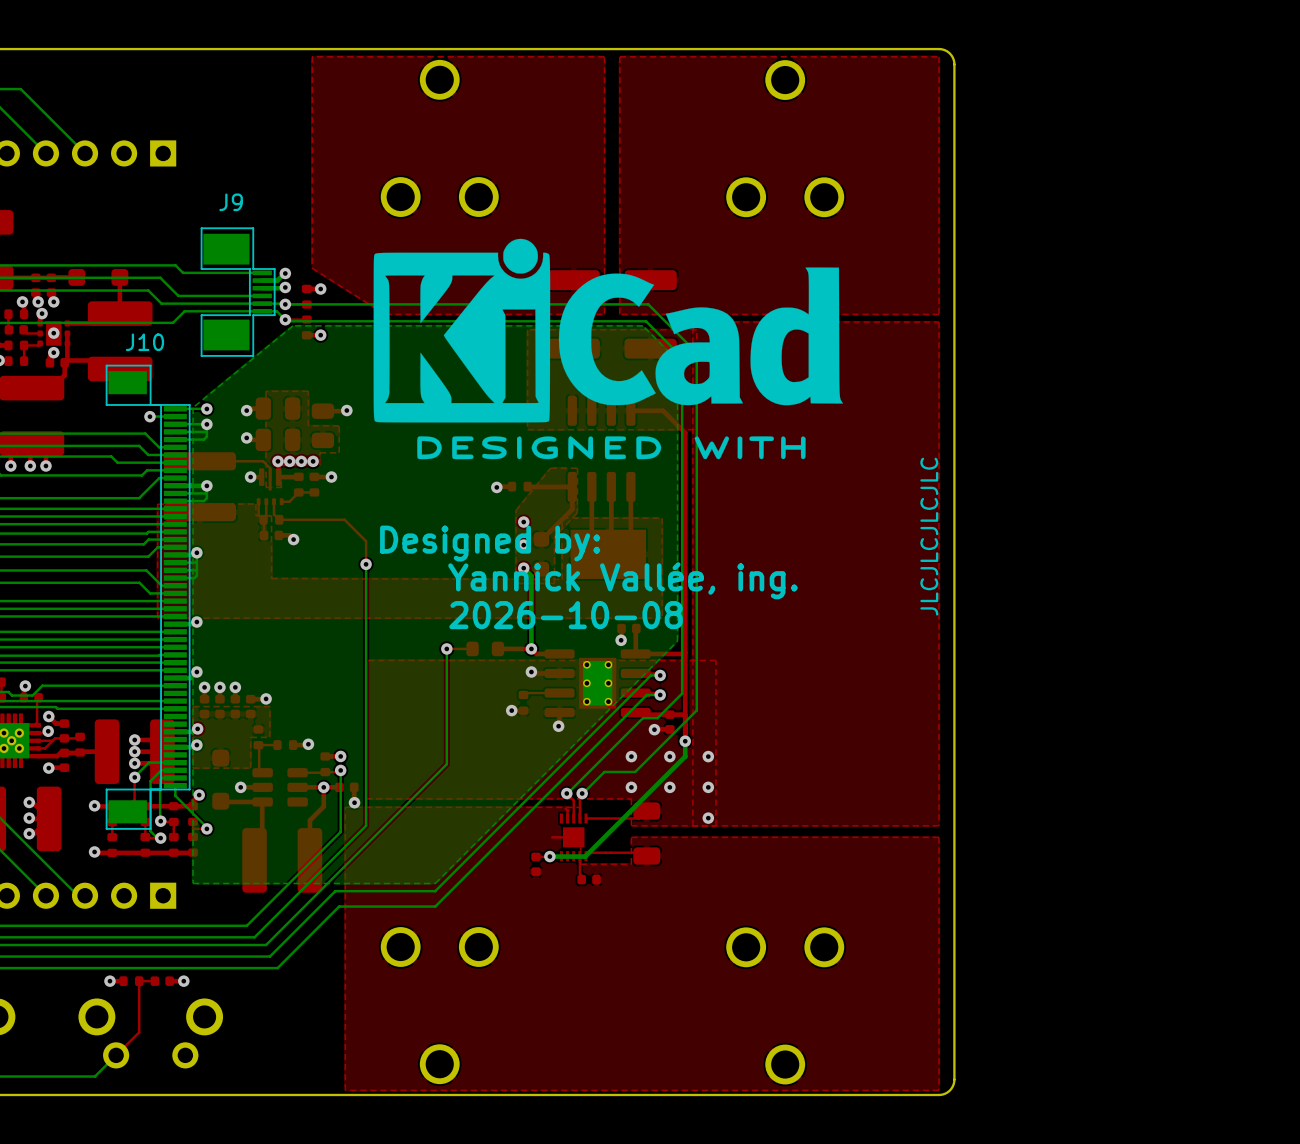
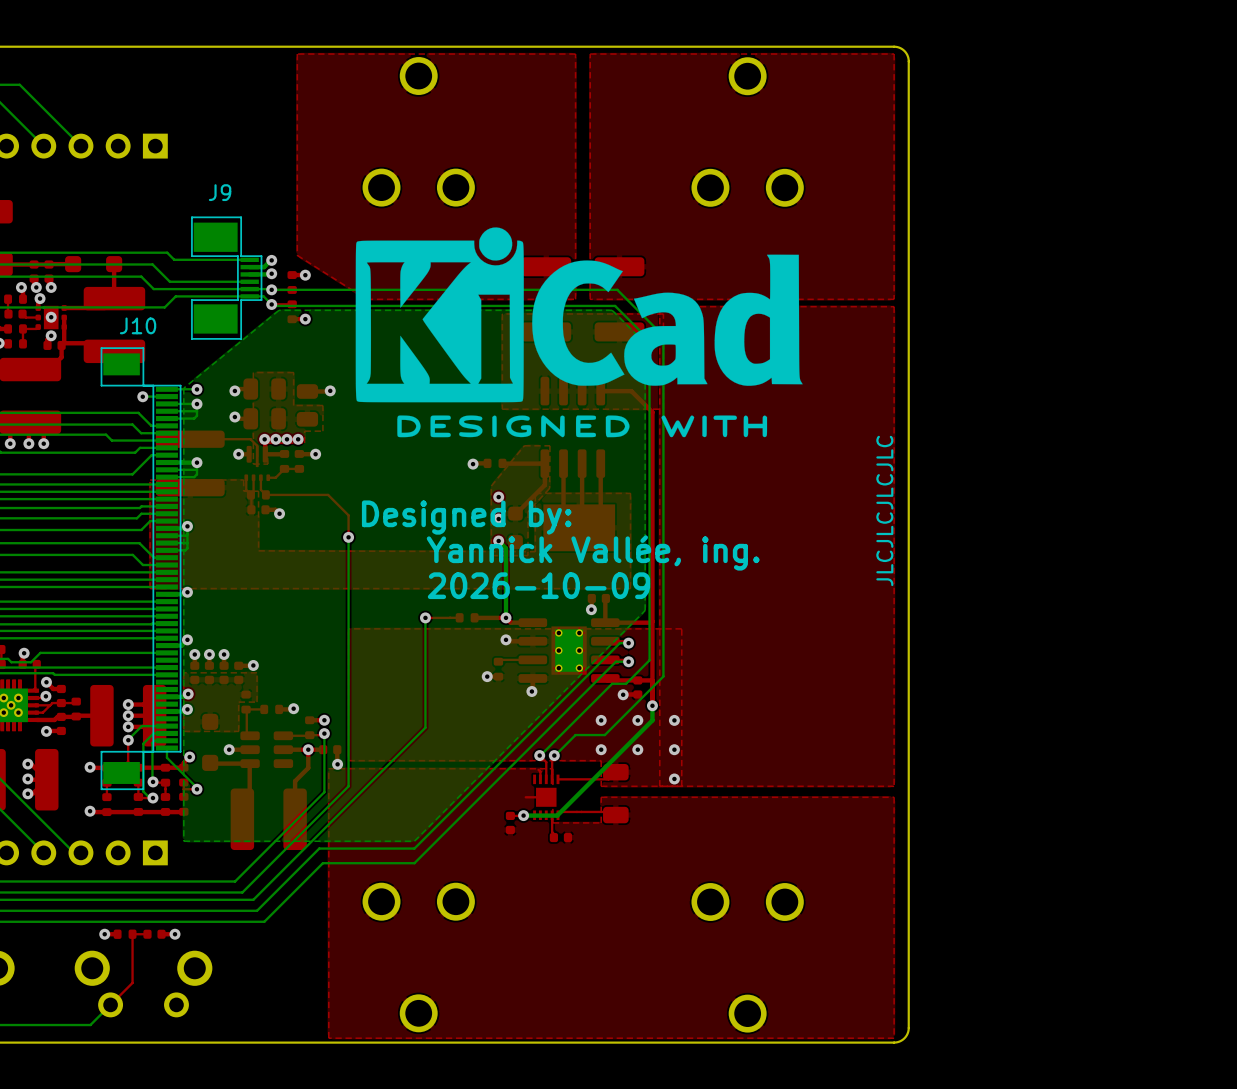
text: 2026-10-08 (566, 615) -> 2026-10-09 (538, 585)
part footprint: [466, 641, 505, 657] -> [455, 613, 479, 623]

